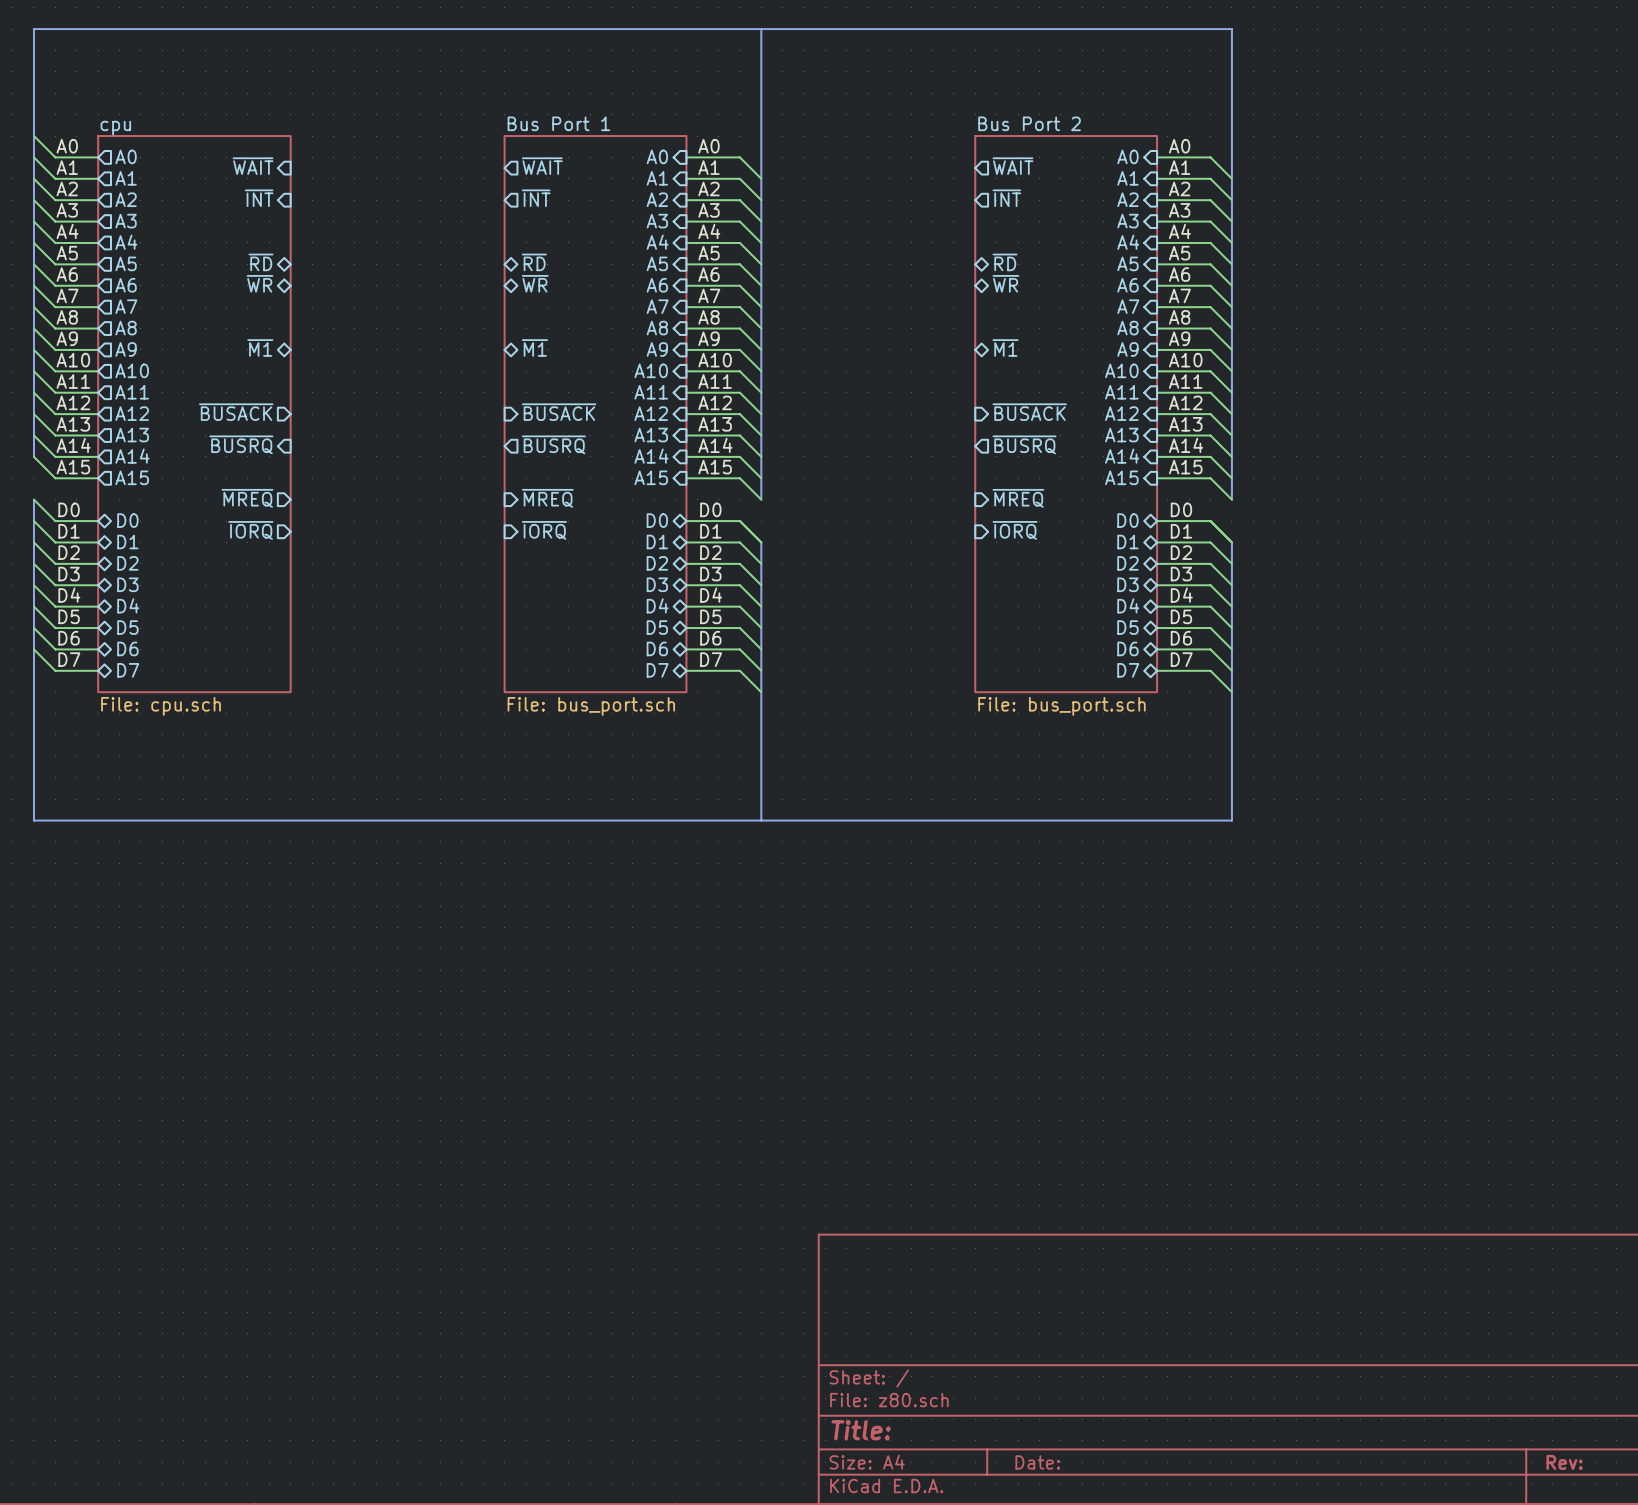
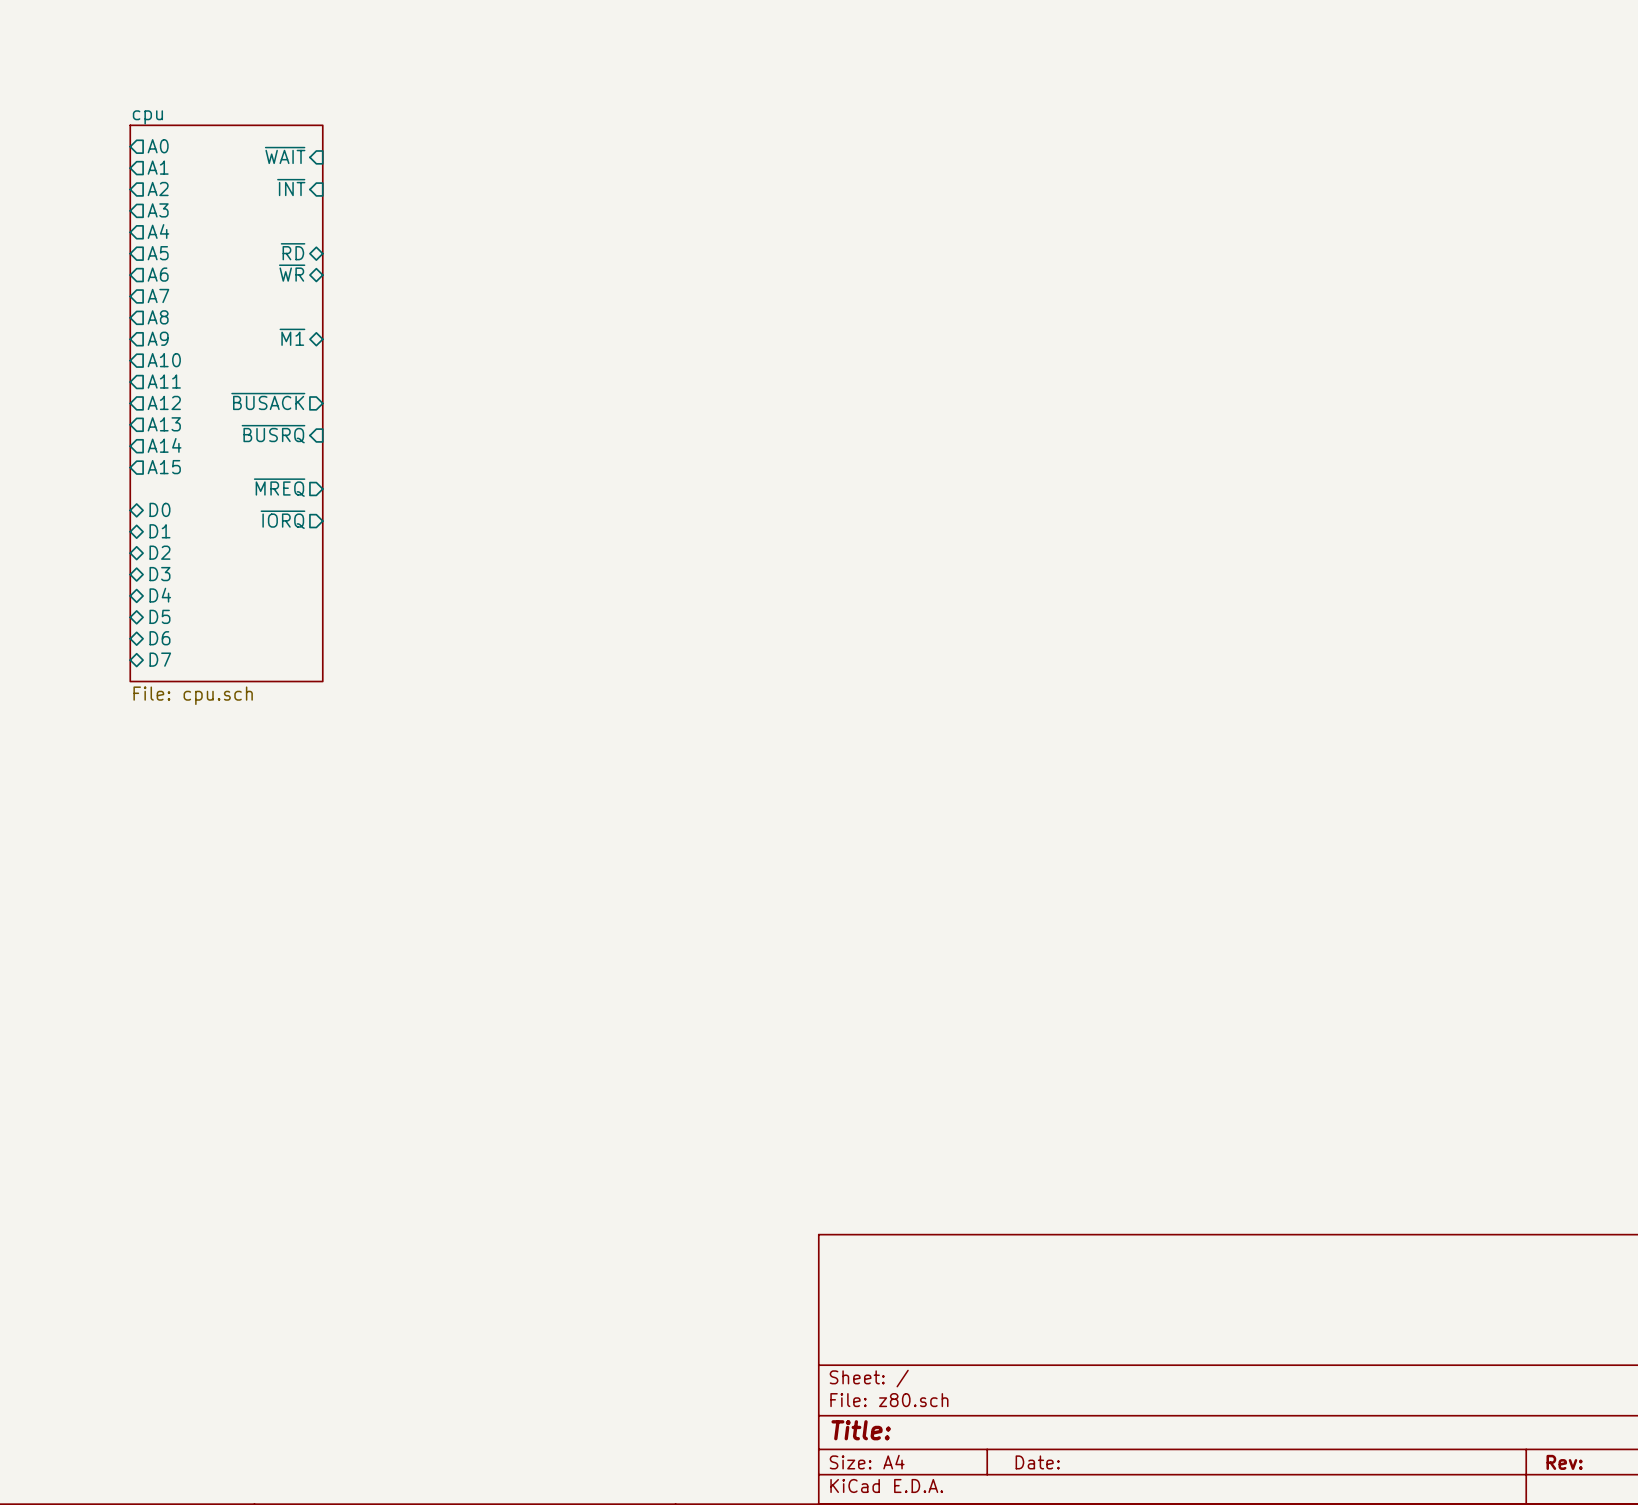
bus: (761, 29) (761, 499) -> none
wire: (33, 136) (55, 157) (98, 157) -> none
label: A0 (67, 146) -> none
label: A0 (708, 146) -> none
label: A0 (1179, 146) -> none
sheet pin position: A0 (126, 156) -> A0 (158, 146)
sheet pin: A0 (657, 156) -> none
sheet pin: A0 (1127, 156) -> none
wire: (33, 157) (55, 178) (98, 178) -> none
wire: (686, 157) (739, 157) (761, 178) -> none
wire: (1157, 157) (1210, 157) (1231, 178) -> none
sheet pin position: ~{WAIT} (253, 166) -> ~{WAIT} (285, 155)
sheet pin: ~{WAIT} (542, 166) -> none
sheet pin: ~{WAIT} (1012, 166) -> none
label: A1 (67, 167) -> none
label: A1 (708, 167) -> none
label: A1 (1179, 167) -> none
wire: (33, 178) (55, 200) (98, 200) -> none
sheet pin position: A1 (126, 178) -> A1 (158, 167)
sheet pin: A1 (657, 178) -> none
wire: (686, 178) (739, 178) (761, 200) -> none
sheet pin: A1 (1127, 178) -> none
wire: (1157, 178) (1210, 178) (1231, 200) -> none
label: A2 (67, 189) -> none
label: A2 (708, 189) -> none
label: A2 (1179, 189) -> none
sheet pin position: ~{INT} (259, 198) -> ~{INT} (291, 187)
sheet pin: ~{INT} (536, 198) -> none
sheet pin: ~{INT} (1006, 198) -> none
sheet pin position: A2 (126, 199) -> A2 (158, 189)
sheet pin: A2 (657, 199) -> none
sheet pin: A2 (1127, 199) -> none
wire: (33, 200) (55, 221) (98, 221) -> none
wire: (686, 200) (739, 200) (761, 221) -> none
wire: (1157, 200) (1210, 200) (1231, 221) -> none
label: A3 (67, 210) -> none
label: A3 (708, 210) -> none
label: A3 (1179, 210) -> none
wire: (33, 221) (55, 242) (98, 242) -> none
sheet pin position: A3 (126, 221) -> A3 (158, 210)
sheet pin: A3 (657, 221) -> none
wire: (686, 221) (739, 221) (761, 242) -> none
sheet pin: A3 (1127, 221) -> none
wire: (1157, 221) (1210, 221) (1231, 242) -> none
label: A4 (67, 231) -> none
label: A4 (709, 231) -> none
label: A4 (1179, 231) -> none
wire: (33, 242) (55, 264) (98, 264) -> none
sheet pin position: A4 (126, 242) -> A4 (158, 231)
sheet pin: A4 (657, 242) -> none
wire: (686, 242) (739, 242) (761, 264) -> none
sheet pin: A4 (1128, 242) -> none
wire: (1157, 242) (1210, 242) (1231, 264) -> none
label: A5 (67, 253) -> none
label: A5 (708, 253) -> none
label: A5 (1179, 253) -> none
sheet pin position: ~{RD} (260, 262) -> ~{RD} (293, 251)
sheet pin: ~{RD} (534, 262) -> none
sheet pin: ~{RD} (1004, 262) -> none
sheet pin position: A5 (126, 263) -> A5 (158, 253)
sheet pin: A5 (657, 263) -> none
sheet pin: A5 (1127, 263) -> none
wire: (33, 264) (55, 285) (98, 285) -> none
wire: (686, 264) (739, 264) (761, 285) -> none
wire: (1157, 264) (1210, 264) (1231, 285) -> none
label: A6 (67, 274) -> none
label: A6 (708, 274) -> none
label: A6 (1179, 274) -> none
sheet pin position: ~{WR} (260, 283) -> ~{WR} (292, 273)
sheet pin: ~{WR} (535, 283) -> none
sheet pin: ~{WR} (1005, 283) -> none
wire: (33, 285) (55, 307) (98, 307) -> none
sheet pin position: A6 (126, 285) -> A6 (158, 274)
sheet pin: A6 (657, 285) -> none
wire: (686, 285) (739, 285) (761, 307) -> none
sheet pin: A6 (1127, 285) -> none
wire: (1157, 285) (1210, 285) (1231, 307) -> none
label: A7 (67, 295) -> none
label: A7 (709, 295) -> none
label: A7 (1179, 295) -> none
sheet pin position: A7 (126, 306) -> A7 (158, 295)
sheet pin: A7 (657, 306) -> none
sheet pin: A7 (1128, 306) -> none
wire: (33, 307) (55, 328) (98, 328) -> none
wire: (686, 307) (739, 307) (761, 328) -> none
wire: (1157, 307) (1210, 307) (1231, 328) -> none
label: A8 (67, 317) -> none
label: A8 (708, 317) -> none
label: A8 (1179, 317) -> none
wire: (33, 328) (55, 349) (98, 349) -> none
sheet pin position: A8 (126, 328) -> A8 (158, 317)
sheet pin: A8 (657, 328) -> none
wire: (686, 328) (739, 328) (761, 349) -> none
sheet pin: A8 (1127, 328) -> none
wire: (1157, 328) (1210, 328) (1231, 349) -> none
label: A9 (67, 338) -> none
label: A9 (708, 338) -> none
label: A9 (1179, 338) -> none
sheet pin position: ~{M1} (260, 347) -> ~{M1} (292, 337)
sheet pin: ~{M1} (534, 347) -> none
sheet pin: ~{M1} (1005, 347) -> none
wire: (33, 349) (55, 371) (98, 371) -> none
sheet pin position: A9 (126, 349) -> A9 (158, 338)
sheet pin: A9 (657, 349) -> none
wire: (686, 349) (739, 349) (761, 371) -> none
sheet pin: A9 (1127, 349) -> none
wire: (1157, 349) (1210, 349) (1231, 371) -> none
label: A10 (73, 360) -> none
label: A10 (715, 360) -> none
label: A10 (1185, 360) -> none
sheet pin position: A10 (132, 370) -> A10 (164, 360)
sheet pin: A10 (651, 370) -> none
sheet pin: A10 (1121, 370) -> none
wire: (33, 371) (55, 392) (98, 392) -> none
wire: (686, 371) (739, 371) (761, 392) -> none
wire: (1157, 371) (1210, 371) (1231, 392) -> none
label: A11 (73, 381) -> none
label: A11 (715, 381) -> none
label: A11 (1185, 381) -> none
wire: (33, 392) (55, 414) (98, 414) -> none
sheet pin position: A11 (132, 392) -> A11 (164, 381)
sheet pin: A11 (651, 392) -> none
wire: (686, 392) (739, 392) (761, 414) -> none
sheet pin: A11 (1121, 392) -> none
wire: (1157, 392) (1210, 392) (1231, 414) -> none
label: A12 (73, 402) -> none
label: A12 (715, 402) -> none
label: A12 (1185, 402) -> none
sheet pin position: ~{BUSACK} (236, 412) -> ~{BUSACK} (268, 401)
sheet pin: ~{BUSACK} (559, 412) -> none
sheet pin: ~{BUSACK} (1029, 412) -> none
sheet pin position: A12 (132, 413) -> A12 (164, 402)
sheet pin: A12 (651, 413) -> none
sheet pin: A12 (1121, 413) -> none
wire: (33, 414) (55, 435) (98, 435) -> none
sheet cpu position: (194, 414) -> (226, 403)
sheet Bus Port 1: File: bus_port.sch (595, 414) -> none
wire: (686, 414) (739, 414) (761, 435) -> none
sheet Bus Port 2: File: bus_port.sch (1066, 414) -> none
wire: (1157, 414) (1210, 414) (1231, 435) -> none
label: A13 (73, 424) -> none
label: A13 (715, 424) -> none
label: A13 (1185, 424) -> none
wire: (33, 435) (55, 456) (98, 456) -> none
sheet pin position: A13 (132, 435) -> A13 (164, 424)
sheet pin: A13 (651, 435) -> none
wire: (686, 435) (739, 435) (761, 456) -> none
sheet pin: A13 (1121, 435) -> none
wire: (1157, 435) (1210, 435) (1231, 456) -> none
sheet pin position: ~{BUSRQ} (241, 444) -> ~{BUSRQ} (273, 434)
sheet pin: ~{BUSRQ} (553, 444) -> none
sheet pin: ~{BUSRQ} (1024, 444) -> none
label: A14 (73, 445) -> none
label: A14 (715, 445) -> none
label: A14 (1186, 445) -> none
wire: (33, 456) (55, 478) (98, 478) -> none
bus: (33, 456) (33, 29) (1231, 29) (1231, 499) -> none
sheet pin position: A14 (132, 456) -> A14 (164, 445)
sheet pin: A14 (651, 456) -> none
wire: (686, 456) (739, 456) (761, 478) -> none
sheet pin: A14 (1122, 456) -> none
wire: (1157, 456) (1210, 456) (1231, 478) -> none
label: A15 (73, 467) -> none
label: A15 (715, 467) -> none
label: A15 (1185, 467) -> none
sheet pin position: A15 (132, 477) -> A15 (164, 467)
sheet pin: A15 (651, 477) -> none
sheet pin: A15 (1121, 477) -> none
wire: (686, 478) (739, 478) (761, 499) -> none
wire: (1157, 478) (1210, 478) (1231, 499) -> none
sheet pin position: ~{MREQ} (247, 498) -> ~{MREQ} (279, 487)
sheet pin: ~{MREQ} (547, 498) -> none
sheet pin: ~{MREQ} (1018, 498) -> none
wire: (33, 499) (55, 521) (98, 521) -> none
bus: (33, 499) (33, 820) (1231, 820) (1231, 542) -> none
label: D0 (69, 509) -> none
label: D0 (710, 509) -> none
label: D0 (1181, 509) -> none
sheet pin position: D0 (127, 520) -> D0 (159, 509)
sheet pin: D0 (657, 520) -> none
sheet pin: D0 (1127, 520) -> none
wire: (33, 521) (55, 542) (98, 542) -> none
wire: (686, 521) (739, 521) (761, 542) -> none
wire: (1157, 521) (1210, 521) (1231, 542) -> none
sheet pin position: ~{IORQ} (250, 530) -> ~{IORQ} (282, 519)
sheet pin: ~{IORQ} (544, 530) -> none
sheet pin: ~{IORQ} (1015, 530) -> none
label: D1 (69, 531) -> none
label: D1 (710, 531) -> none
label: D1 (1181, 531) -> none
sheet pin position: D1 (127, 541) -> D1 (159, 531)
sheet pin: D1 (657, 541) -> none
sheet pin: D1 (1127, 541) -> none
wire: (33, 542) (55, 563) (98, 563) -> none
wire: (686, 542) (739, 542) (761, 563) -> none
bus: (761, 542) (761, 820) -> none
wire: (1157, 542) (1210, 542) (1231, 563) -> none
label: D2 (69, 552) -> none
label: D2 (710, 552) -> none
label: D2 (1181, 552) -> none
wire: (33, 563) (55, 585) (98, 585) -> none
sheet pin position: D2 (127, 563) -> D2 (159, 552)
sheet pin: D2 (657, 563) -> none
wire: (686, 563) (739, 563) (761, 585) -> none
sheet pin: D2 (1127, 563) -> none
wire: (1157, 563) (1210, 563) (1231, 585) -> none
label: D3 (69, 574) -> none
label: D3 (710, 574) -> none
label: D3 (1181, 574) -> none
sheet pin position: D3 (127, 584) -> D3 (159, 574)
sheet pin: D3 (657, 584) -> none
sheet pin: D3 (1127, 584) -> none
wire: (33, 585) (55, 606) (98, 606) -> none
wire: (686, 585) (739, 585) (761, 606) -> none
wire: (1157, 585) (1210, 585) (1231, 606) -> none
label: D4 (69, 595) -> none
label: D4 (711, 595) -> none
label: D4 (1181, 595) -> none
sheet pin position: D4 (128, 605) -> D4 (160, 595)
sheet pin: D4 (657, 605) -> none
sheet pin: D4 (1128, 605) -> none
wire: (33, 606) (55, 628) (98, 628) -> none
wire: (686, 606) (739, 606) (761, 628) -> none
wire: (1157, 606) (1210, 606) (1231, 628) -> none
label: D5 (69, 616) -> none
label: D5 (710, 616) -> none
label: D5 (1181, 616) -> none
sheet pin position: D5 (127, 627) -> D5 (159, 616)
sheet pin: D5 (657, 627) -> none
sheet pin: D5 (1127, 627) -> none
wire: (33, 628) (55, 649) (98, 649) -> none
wire: (686, 628) (739, 628) (761, 649) -> none
wire: (1157, 628) (1210, 628) (1231, 649) -> none
label: D6 (69, 638) -> none
label: D6 (710, 638) -> none
label: D6 (1181, 638) -> none
sheet pin position: D6 (127, 648) -> D6 (159, 638)
sheet pin: D6 (657, 648) -> none
sheet pin: D6 (1127, 648) -> none
wire: (33, 649) (55, 670) (98, 670) -> none
wire: (686, 649) (739, 649) (761, 670) -> none
wire: (1157, 649) (1210, 649) (1231, 670) -> none
label: D7 (69, 659) -> none
label: D7 (711, 659) -> none
label: D7 (1181, 659) -> none
sheet pin position: D7 (128, 670) -> D7 (160, 659)
sheet pin: D7 (657, 670) -> none
wire: (686, 670) (739, 670) (761, 692) -> none
sheet pin: D7 (1128, 670) -> none
wire: (1157, 670) (1210, 670) (1231, 692) -> none

